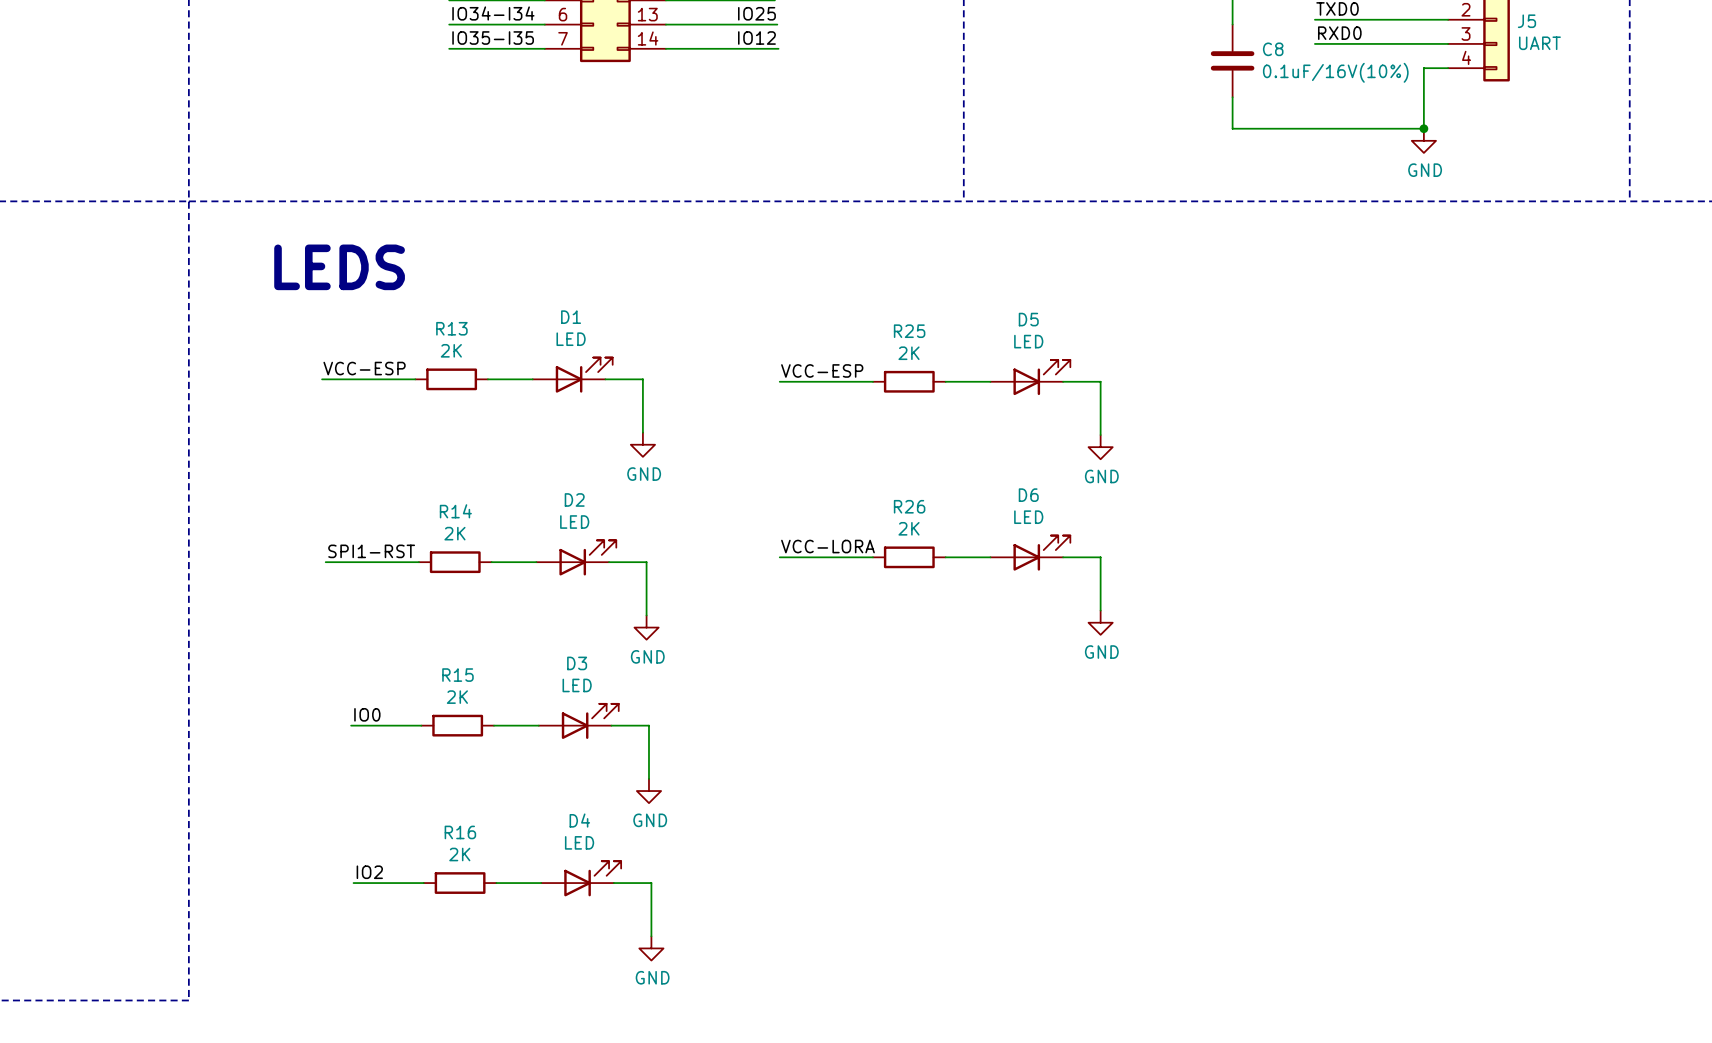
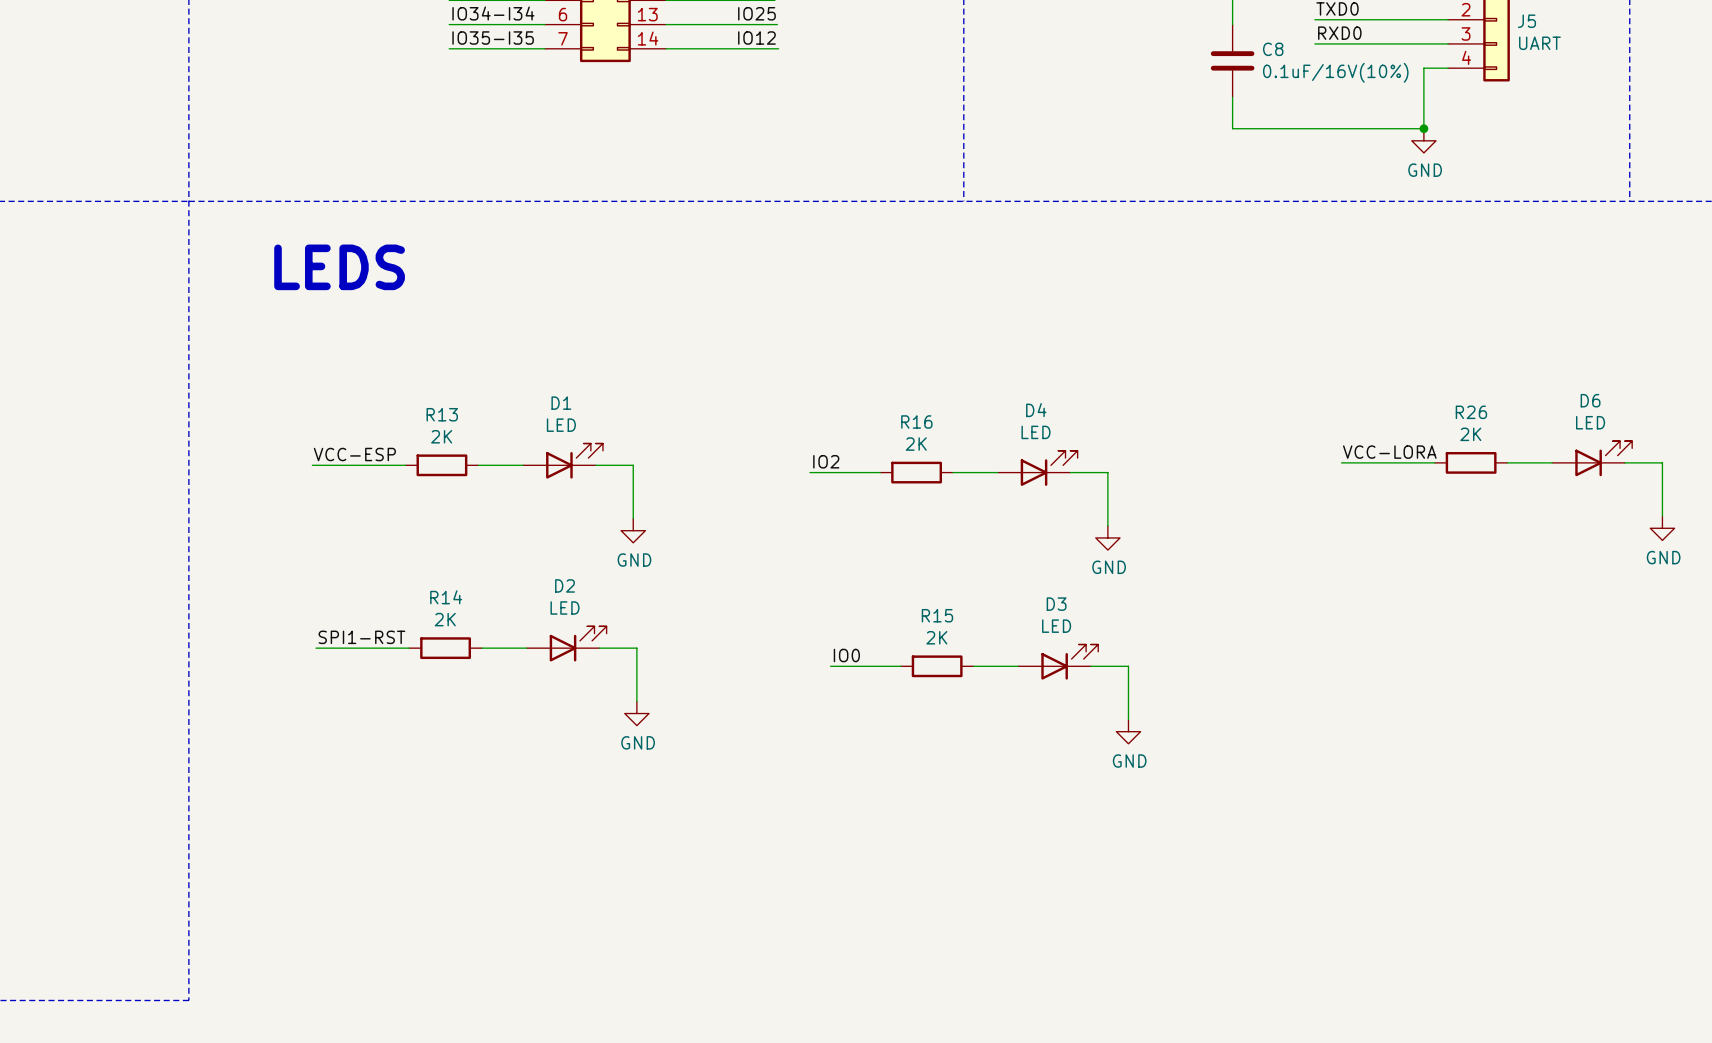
label position: VCC-ESP (364, 368) -> VCC-ESP (354, 454)
label: VCC-ESP (822, 370) -> none
D1 position: (572, 375) -> (563, 461)
D5: LED (1030, 377) -> none
wire: (322, 379) (415, 379) -> (312, 465) (405, 465)
R13 position: (451, 379) -> (441, 465)
wire: (487, 379) (532, 379) -> (478, 465) (523, 465)
wire: (605, 379) (642, 379) (642, 432) -> (595, 465) (633, 465) (633, 518)
wire: (779, 381) (872, 381) -> none
R25: 2K (909, 381) -> none
wire: (945, 381) (990, 381) -> none
wire: (1063, 381) (1100, 381) (1100, 435) -> none
power symbol: GND (642, 444) -> none
power symbol: GND (1100, 447) -> none
label: none -> VCC-LORA (1389, 452)
label: none -> IO2 (826, 461)
wire: none -> (1341, 462) (1434, 462)
wire: none -> (1507, 462) (1552, 462)
wire: none -> (1624, 462) (1662, 462) (1662, 516)
wire: none -> (810, 472) (880, 472)
power symbol: none -> GND (1662, 528)
power symbol: none -> GND (633, 530)
power symbol: none -> GND (1107, 537)
label: VCC-LORA (827, 546) -> none
label position: SPI1-RST (371, 551) -> SPI1-RST (361, 637)
D6 position: (1030, 553) -> (1592, 458)
D2 position: (576, 557) -> (566, 643)
wire: (779, 557) (872, 557) -> none
R26 position: (909, 557) -> (1471, 462)
wire: (945, 557) (990, 557) -> (952, 472) (997, 472)
wire: (1063, 557) (1100, 557) (1100, 610) -> (1070, 472) (1107, 472) (1107, 525)
wire: (325, 562) (418, 562) -> (316, 648) (409, 648)
R14 position: (455, 562) -> (445, 648)
wire: (491, 562) (536, 562) -> (481, 648) (526, 648)
wire: (609, 562) (646, 562) (646, 615) -> (599, 648) (636, 648) (636, 701)
power symbol: GND (1100, 622) -> none
power symbol: GND (646, 627) -> none
label: none -> IO0 (846, 655)
wire: none -> (830, 666) (900, 666)
wire: none -> (973, 666) (1018, 666)
wire: none -> (1090, 666) (1128, 666) (1128, 719)
power symbol: none -> GND (636, 713)
label: IO0 (367, 714) -> none
D3 position: (578, 721) -> (1058, 662)
wire: (351, 725) (421, 725) -> none
R15 position: (457, 725) -> (937, 666)
wire: (494, 725) (538, 725) -> none
wire: (611, 725) (648, 725) (648, 778) -> none
power symbol: none -> GND (1128, 731)
power symbol: GND (648, 791) -> none
label: IO2 (369, 872) -> none
D4 position: (581, 878) -> (1037, 468)
wire: (353, 883) (423, 883) -> none
R16 position: (460, 883) -> (916, 472)
wire: (496, 883) (541, 883) -> none
wire: (613, 883) (651, 883) (651, 936) -> none
power symbol: GND (651, 948) -> none

